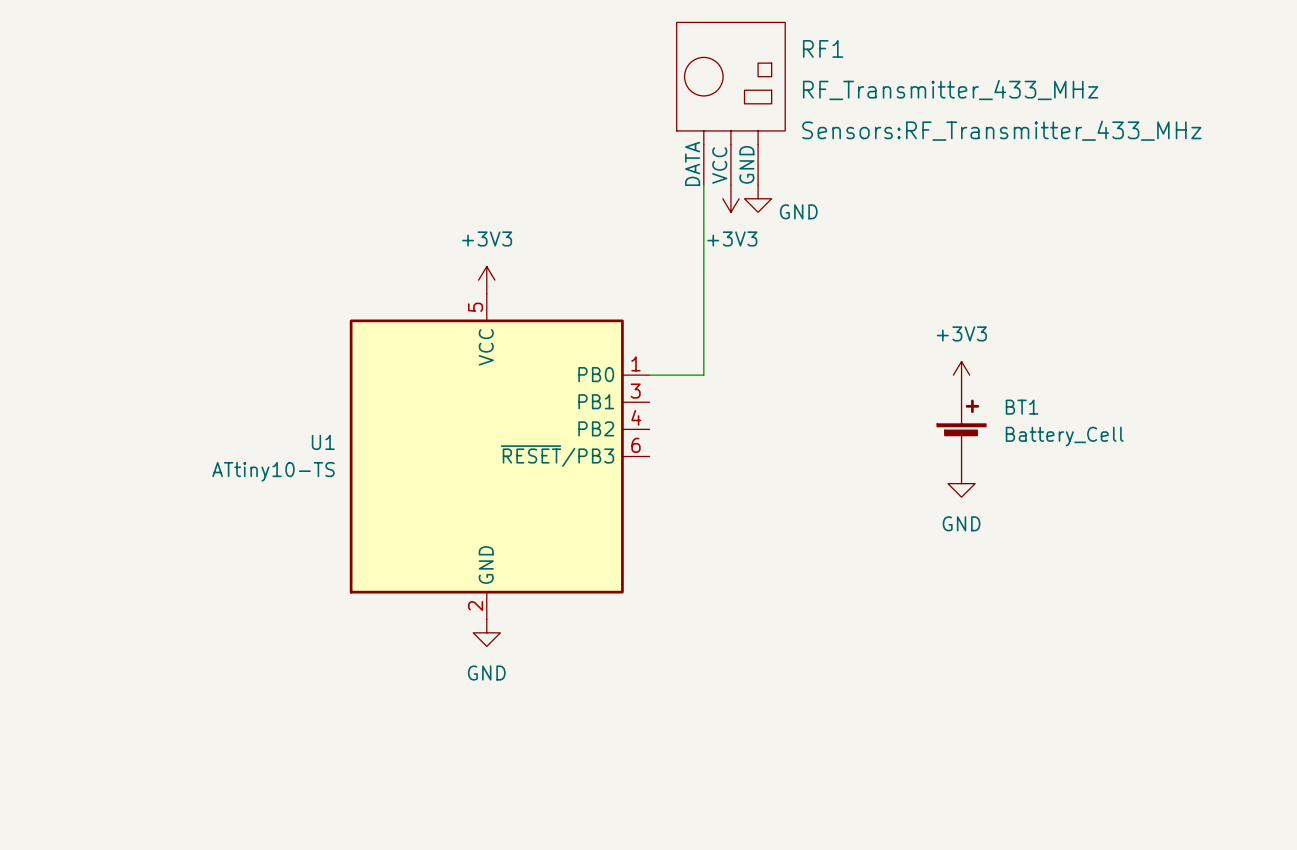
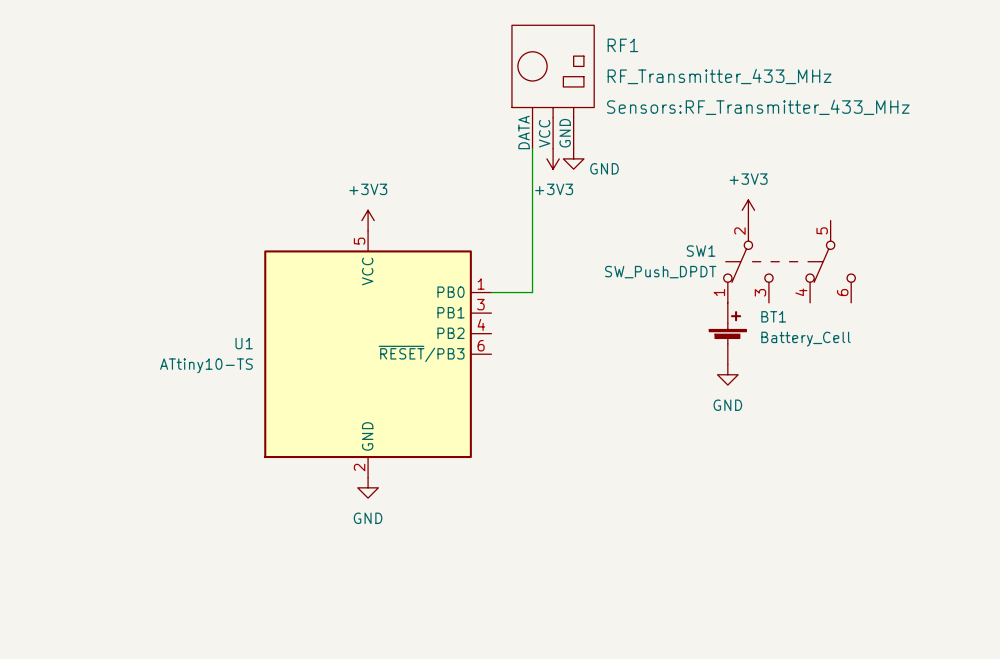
SW1: none -> SW_Push_DPDT (789, 261)
power symbol position: +3V3 (961, 375) -> +3V3 (748, 210)

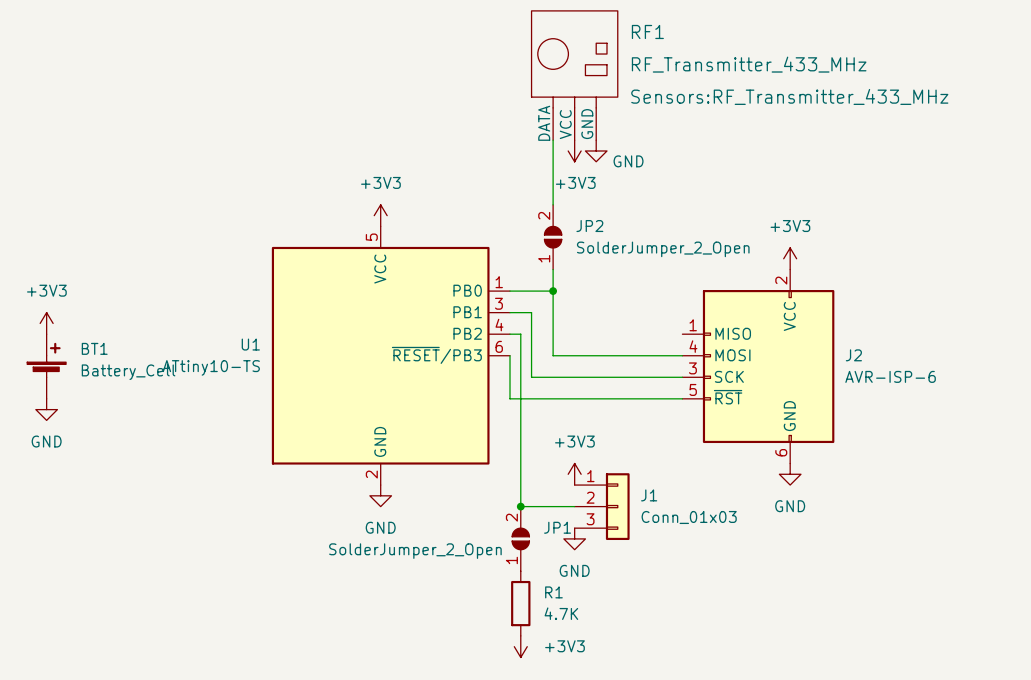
power symbol position: +3V3 (748, 210) -> +3V3 (790, 258)
JP2: none -> SolderJumper_2_Open (553, 237)
SW1: SW_Push_DPDT (789, 261) -> none
wire: none -> (553, 291) (553, 355) (682, 355)
junction: none -> (553, 291)
wire: none -> (510, 312) (531, 312) (531, 377) (682, 377)
power symbol: none -> +3V3 (46, 323)
wire: none -> (510, 334) (520, 334) (520, 506) (574, 506)
BT1 position: (727, 333) -> (46, 366)
wire: none -> (510, 355) (510, 398) (682, 398)
J2: none -> AVR-ISP-6 (758, 366)
power symbol position: GND (727, 374) -> GND (790, 474)
power symbol: none -> GND (46, 409)
power symbol: none -> +3V3 (574, 474)
junction: none -> (520, 506)
J1: none -> Conn_01x03 (602, 506)
JP1: none -> SolderJumper_2_Open (520, 538)
power symbol: none -> GND (574, 538)
R1: none -> 4.7K (520, 603)
power symbol: none -> +3V3 (520, 646)

